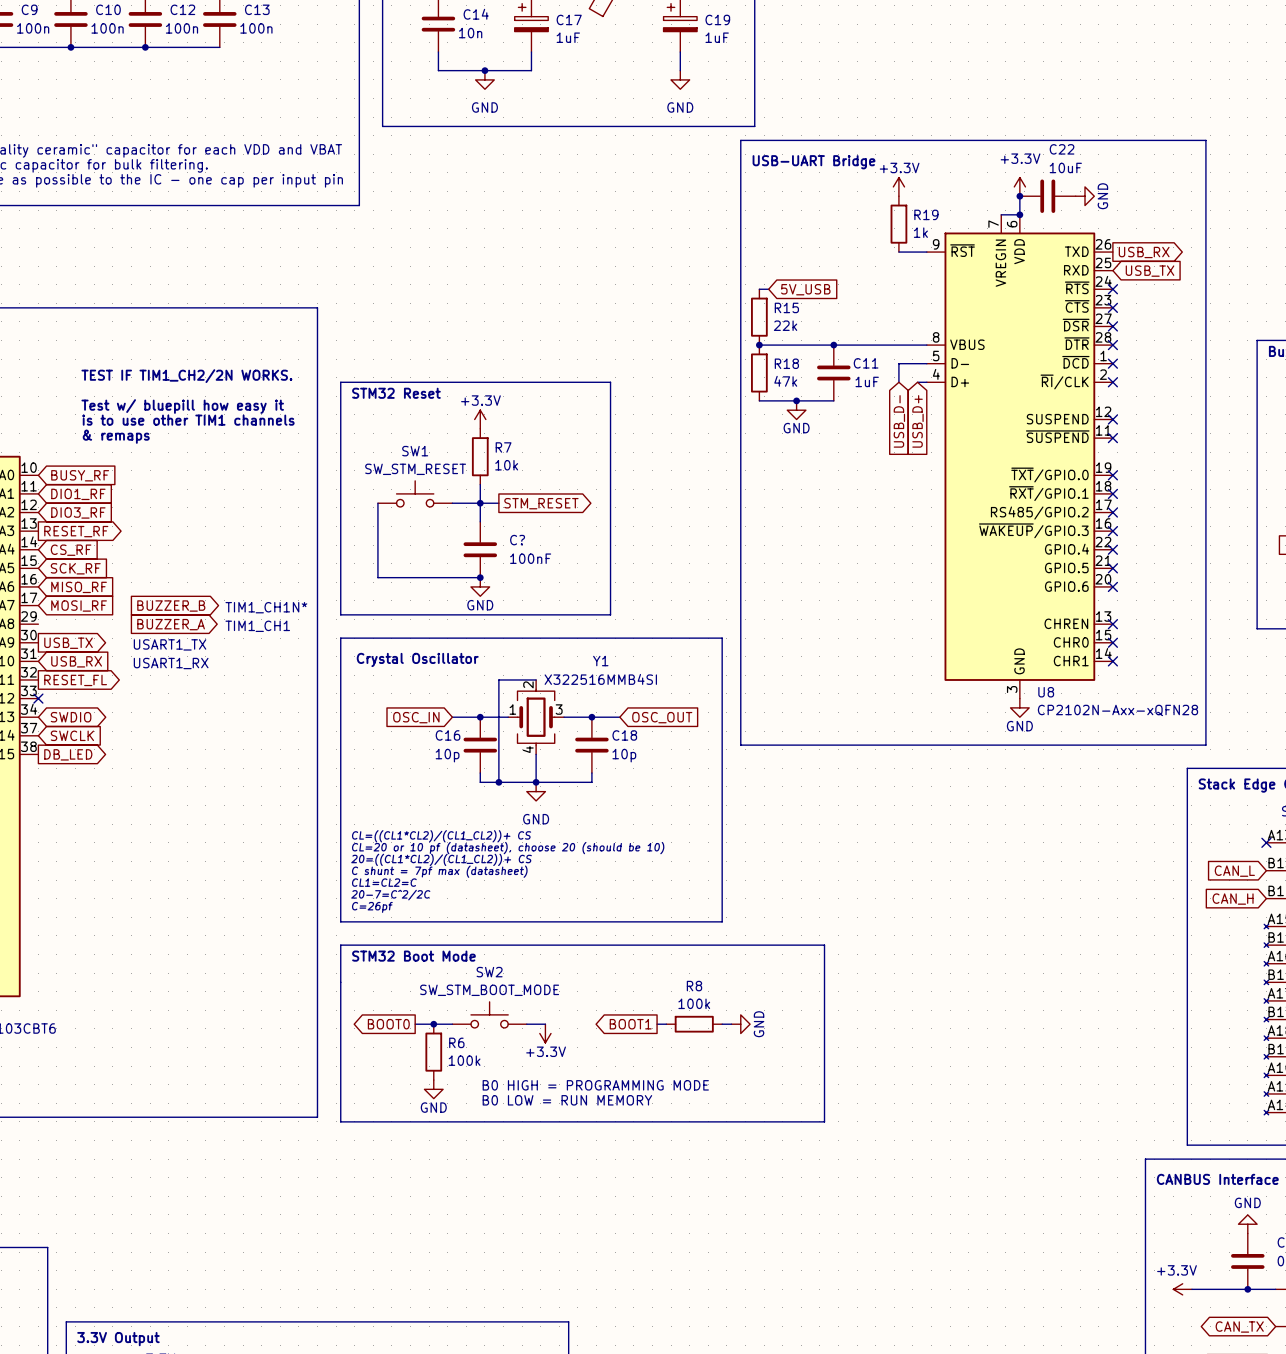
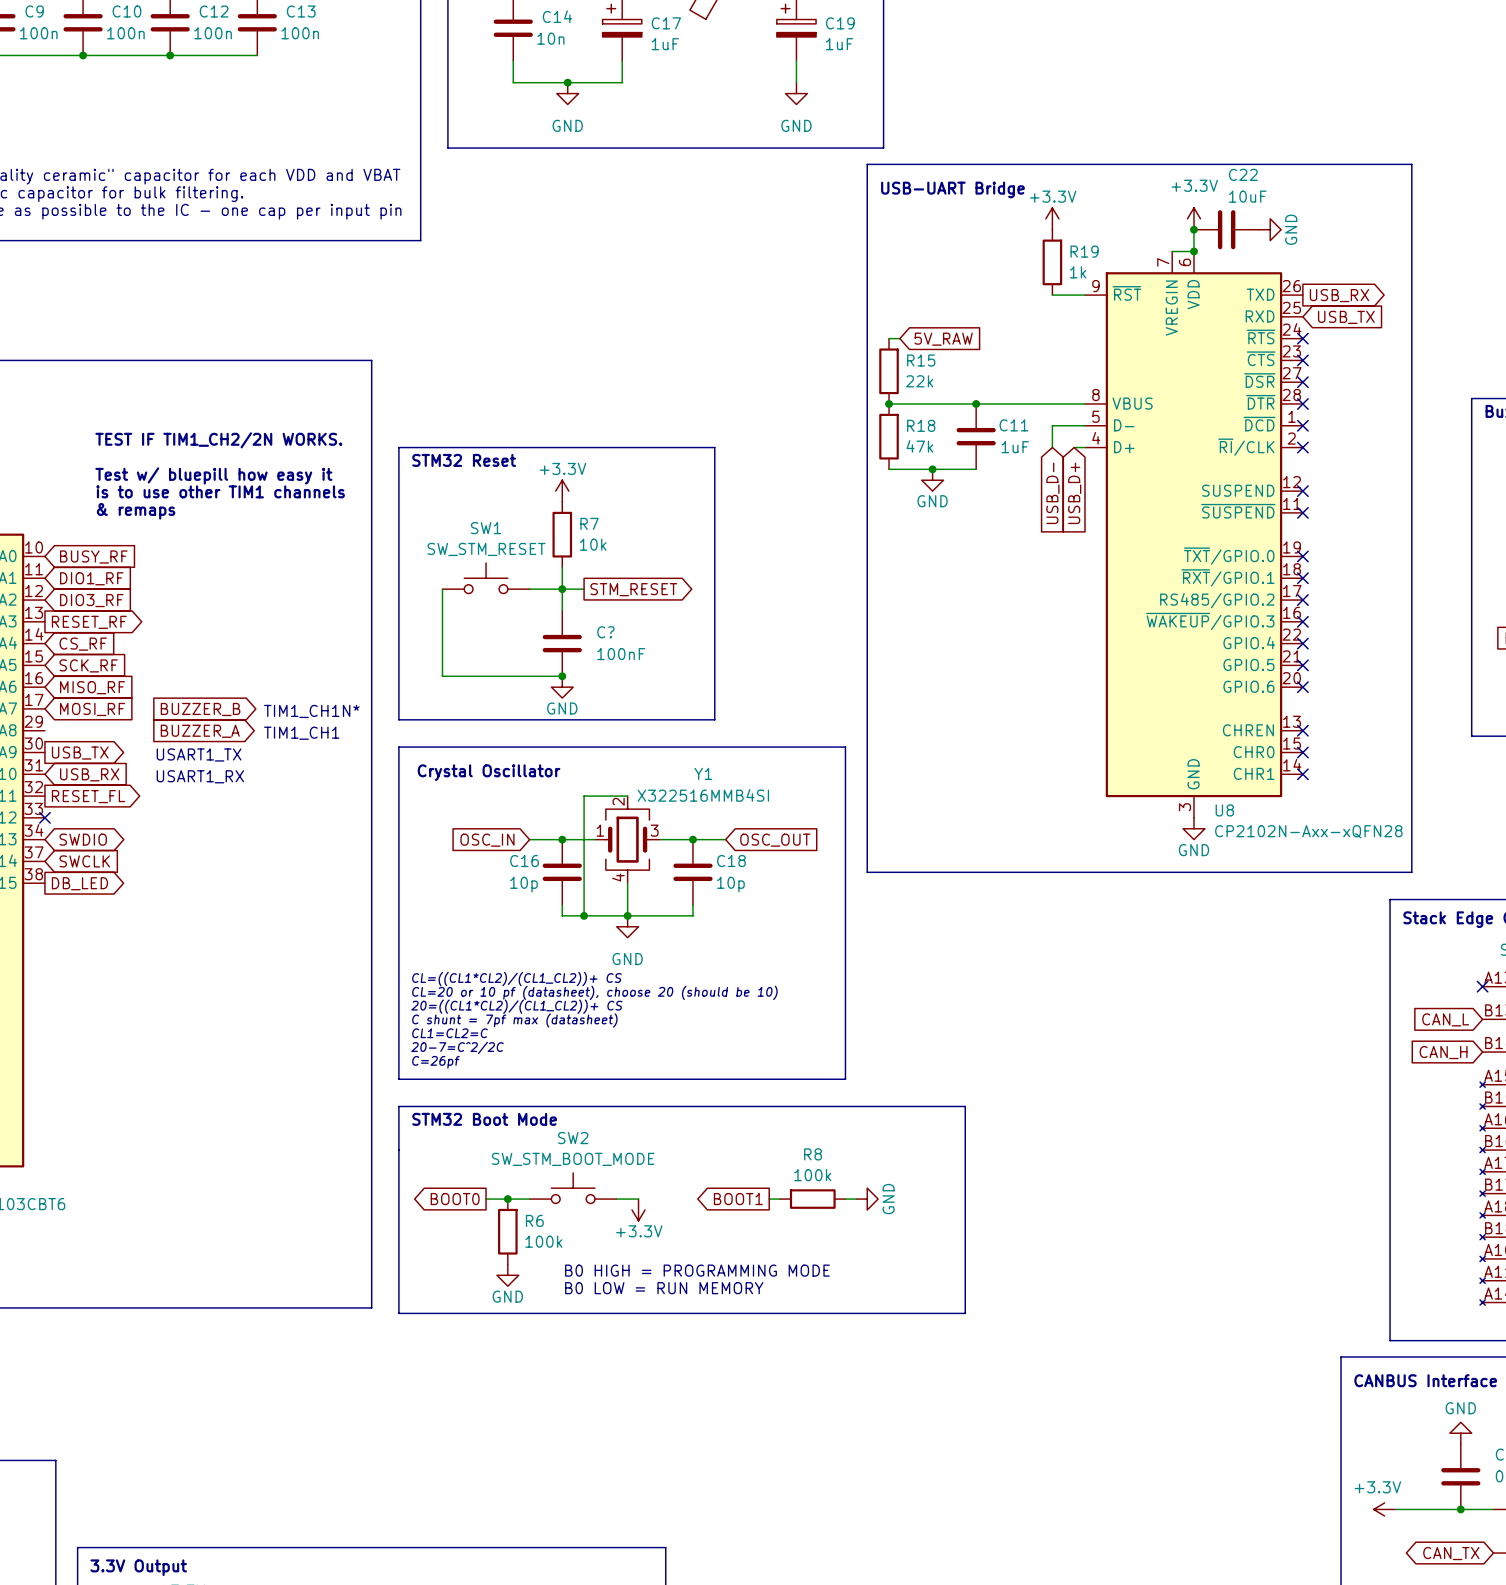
global label: 5V_USB (805, 289) -> 5V_RAW (943, 339)

